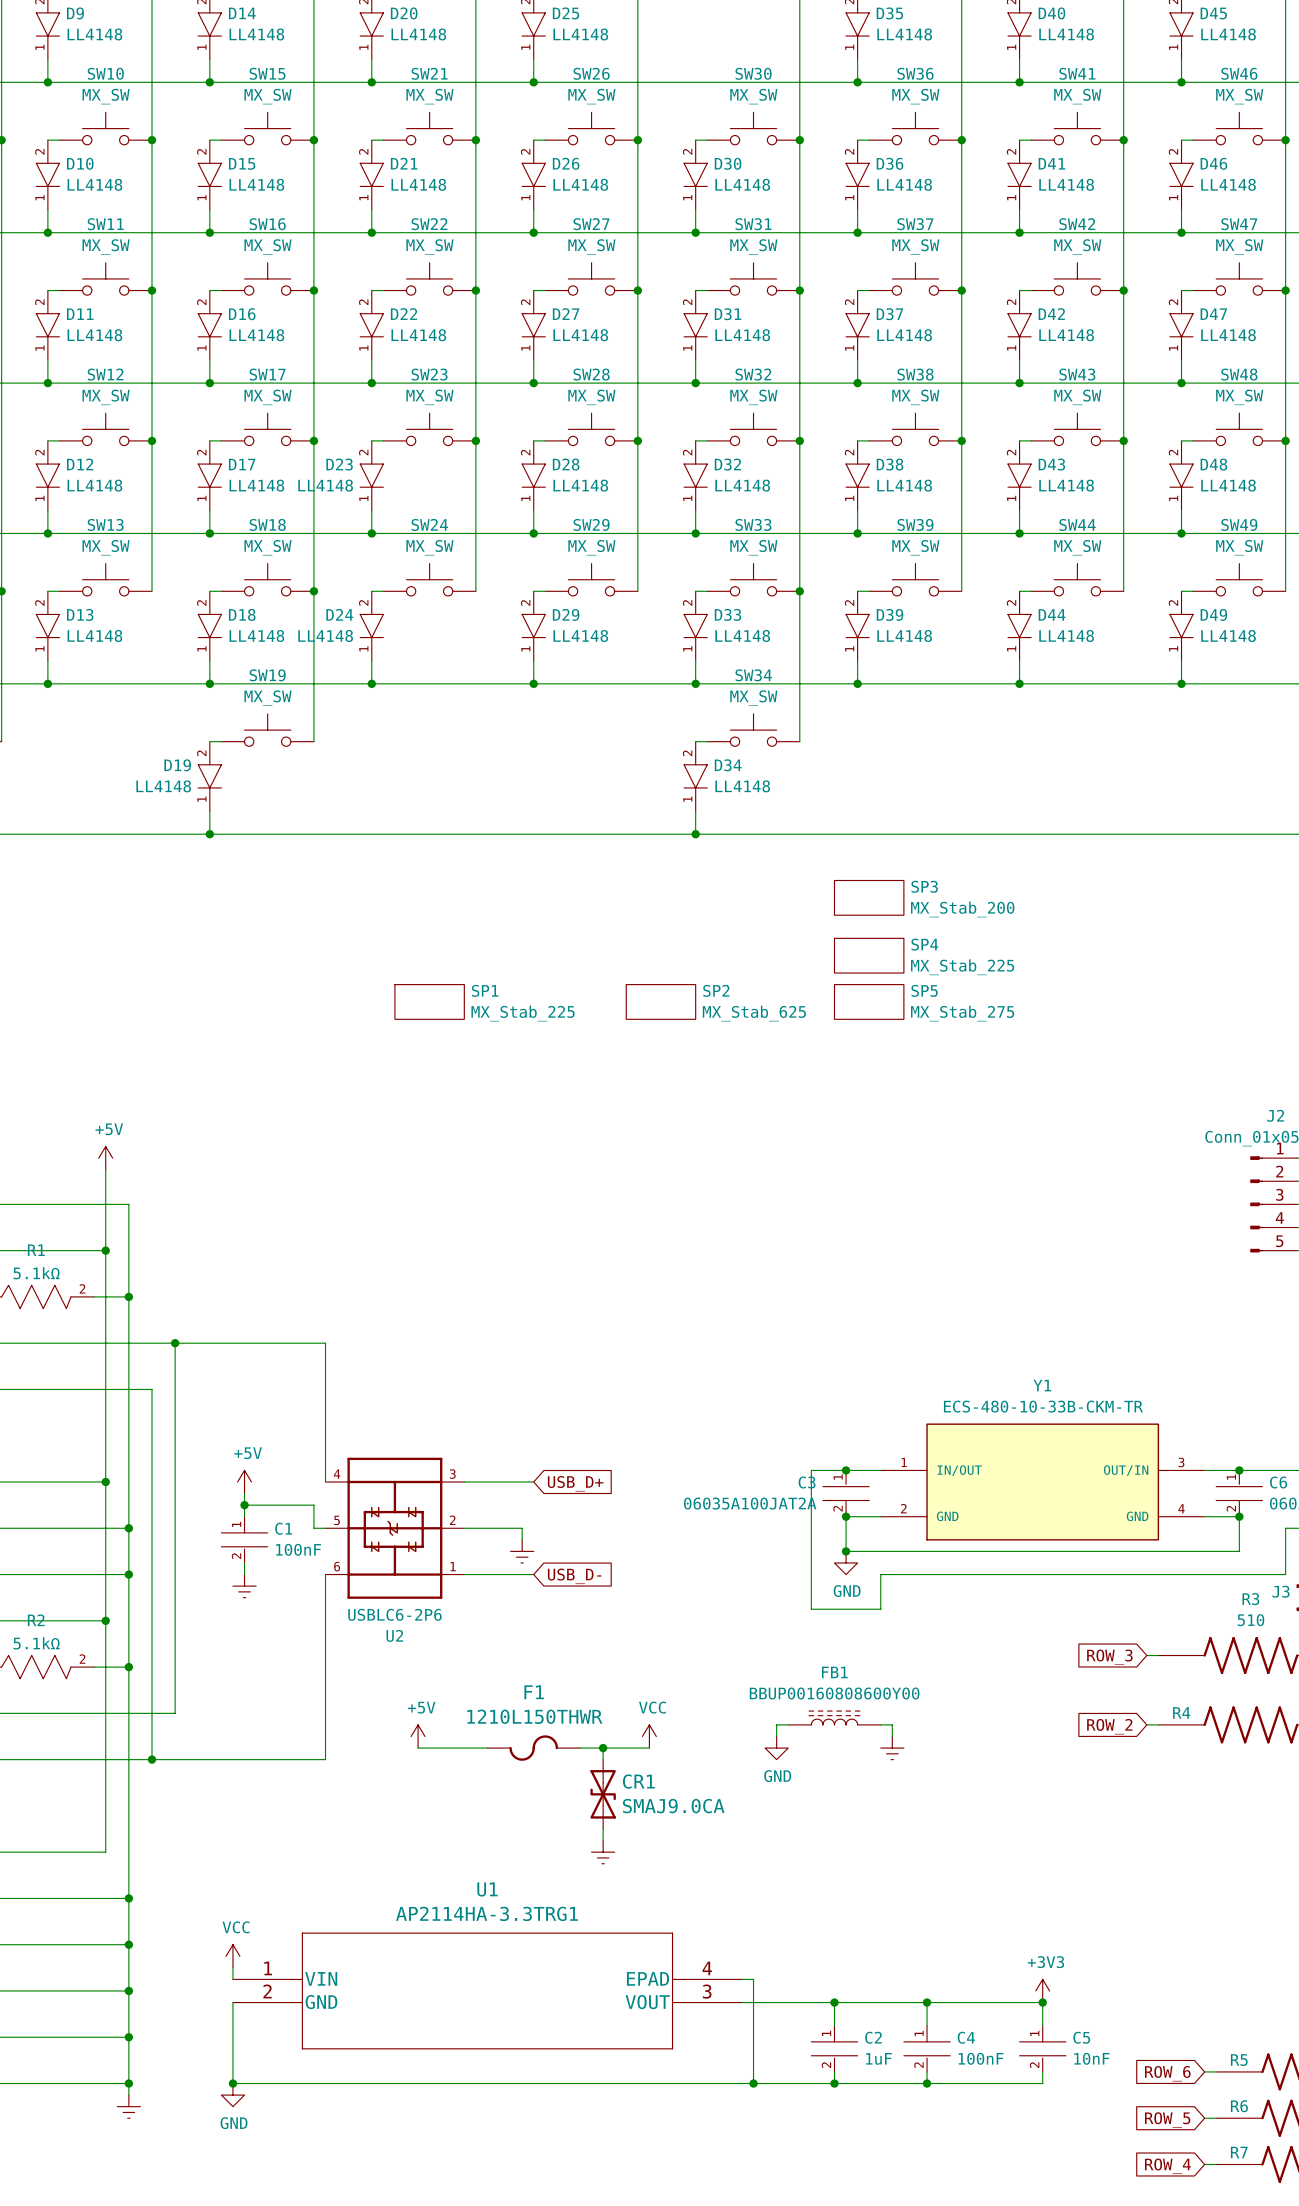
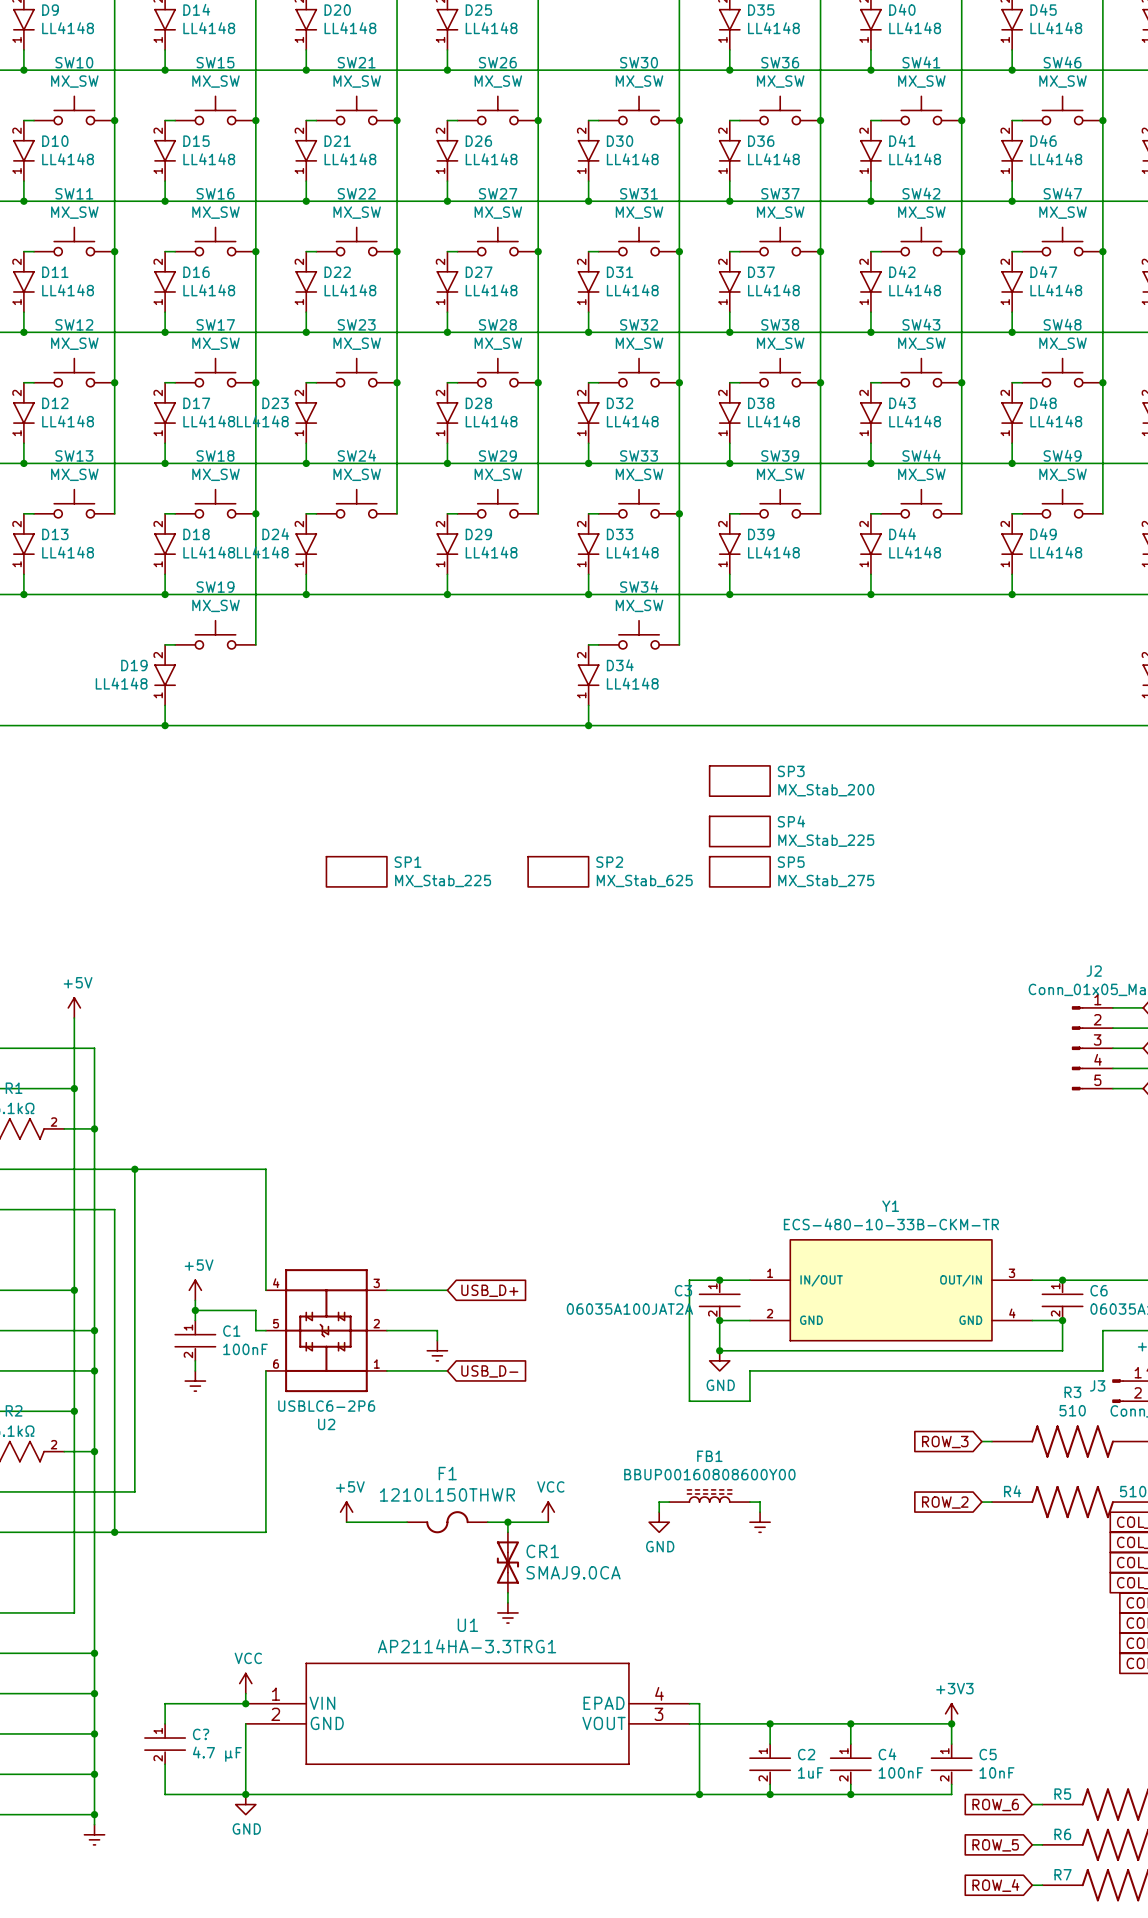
wire: none -> (245, 1693) (245, 1703) (165, 1703) (165, 1723)
power symbol position: VCC (232, 1956) -> VCC (245, 1683)
junction: none -> (245, 1703)
wire: (232, 1967) (232, 1979) -> none
wire: (741, 1979) (753, 1979) (753, 2083) -> (689, 1703) (699, 1703) (699, 1794)
junction: none -> (770, 1723)
junction: none -> (850, 1723)
junction: none -> (951, 1723)
U1 position: (487, 1990) -> (467, 1713)
power symbol position: +3V3 (1042, 1990) -> +3V3 (951, 1713)
C?: none -> (165, 1744)
wire: (232, 2002) (232, 2083) (1042, 2083) (1042, 2071) -> none
wire: (741, 2002) (1042, 2002) (1042, 2025) -> (689, 1723) (951, 1723) (951, 1744)
wire: (834, 2002) (834, 2025) -> (770, 1723) (770, 1744)
junction: (834, 2002) -> none
wire: (927, 2002) (927, 2025) -> (850, 1723) (850, 1744)
junction: (927, 2002) -> none
junction: (1042, 2002) -> none
wire: none -> (165, 1764) (165, 1794) (951, 1794) (951, 1784)
C2 position: (834, 2048) -> (770, 1764)
C4 position: (927, 2048) -> (850, 1764)
C5 position: (1042, 2048) -> (951, 1764)
junction: none -> (245, 1794)
junction: none -> (770, 1794)
junction: none -> (850, 1794)
wire: (834, 2071) (834, 2083) -> (770, 1784) (770, 1794)
wire: (927, 2071) (927, 2083) -> (850, 1784) (850, 1794)
junction: (232, 2083) -> none
junction: (753, 2083) -> none
junction position: (834, 2083) -> (699, 1794)
junction: (927, 2083) -> none
power symbol position: GND (232, 2095) -> GND (245, 1804)

